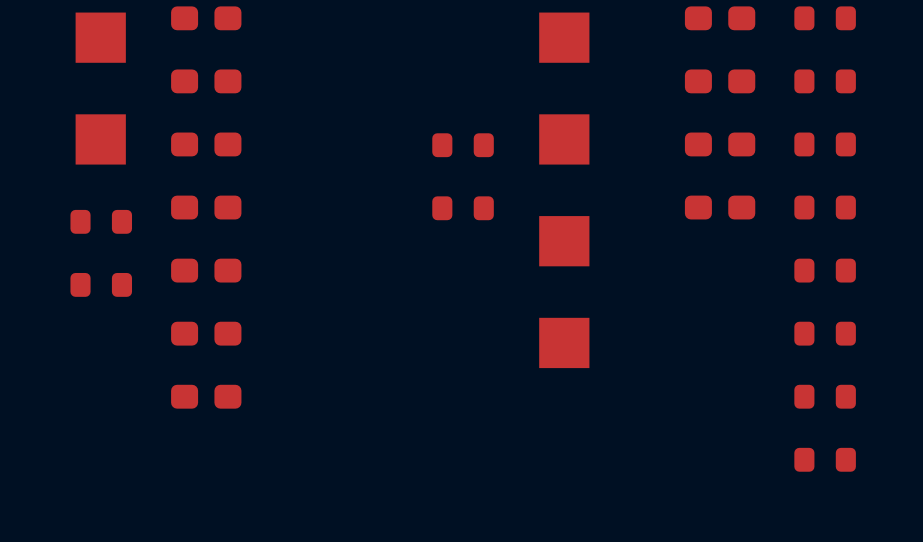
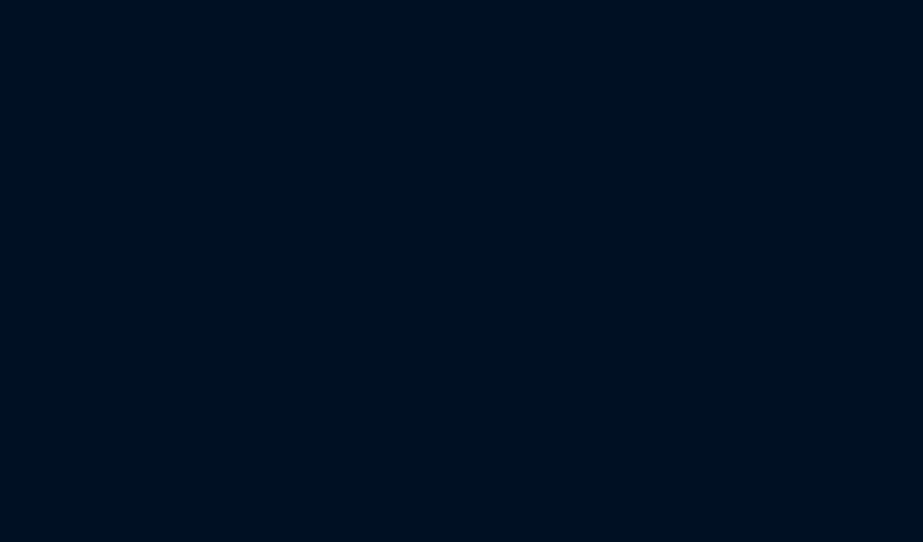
part: (206, 18) -> none
part: (720, 18) -> none
part: (825, 18) -> none
part: (100, 37) -> none
part: (564, 37) -> none
part: (206, 81) -> none
part: (720, 81) -> none
part: (825, 81) -> none
part: (100, 139) -> none
part: (564, 139) -> none
part: (206, 144) -> none
part: (720, 144) -> none
part: (825, 144) -> none
part: (463, 145) -> none
part: (206, 207) -> none
part: (720, 207) -> none
part: (825, 207) -> none
part: (463, 208) -> none
part: (101, 221) -> none
part: (564, 241) -> none
part: (206, 270) -> none
part: (825, 270) -> none
part: (101, 284) -> none
part: (206, 333) -> none
part: (825, 333) -> none
part: (564, 342) -> none
part: (206, 396) -> none
part: (825, 396) -> none
part: (825, 459) -> none

